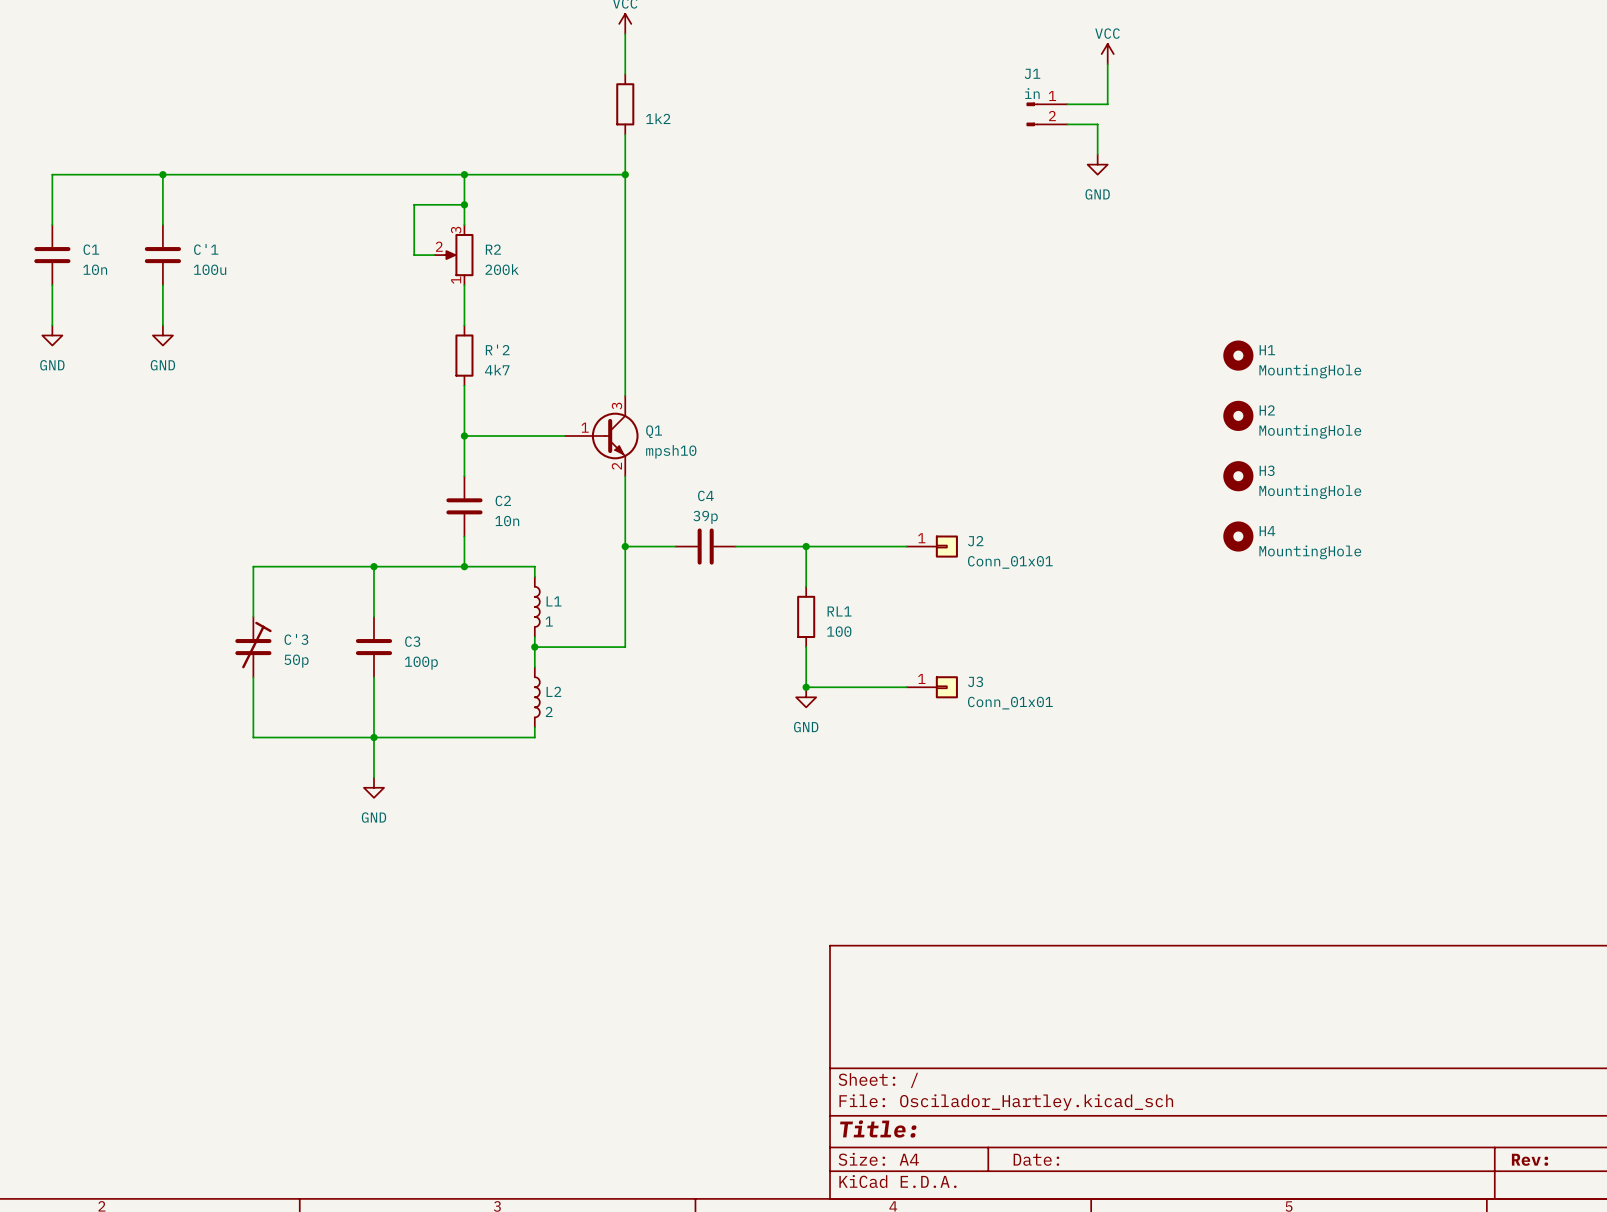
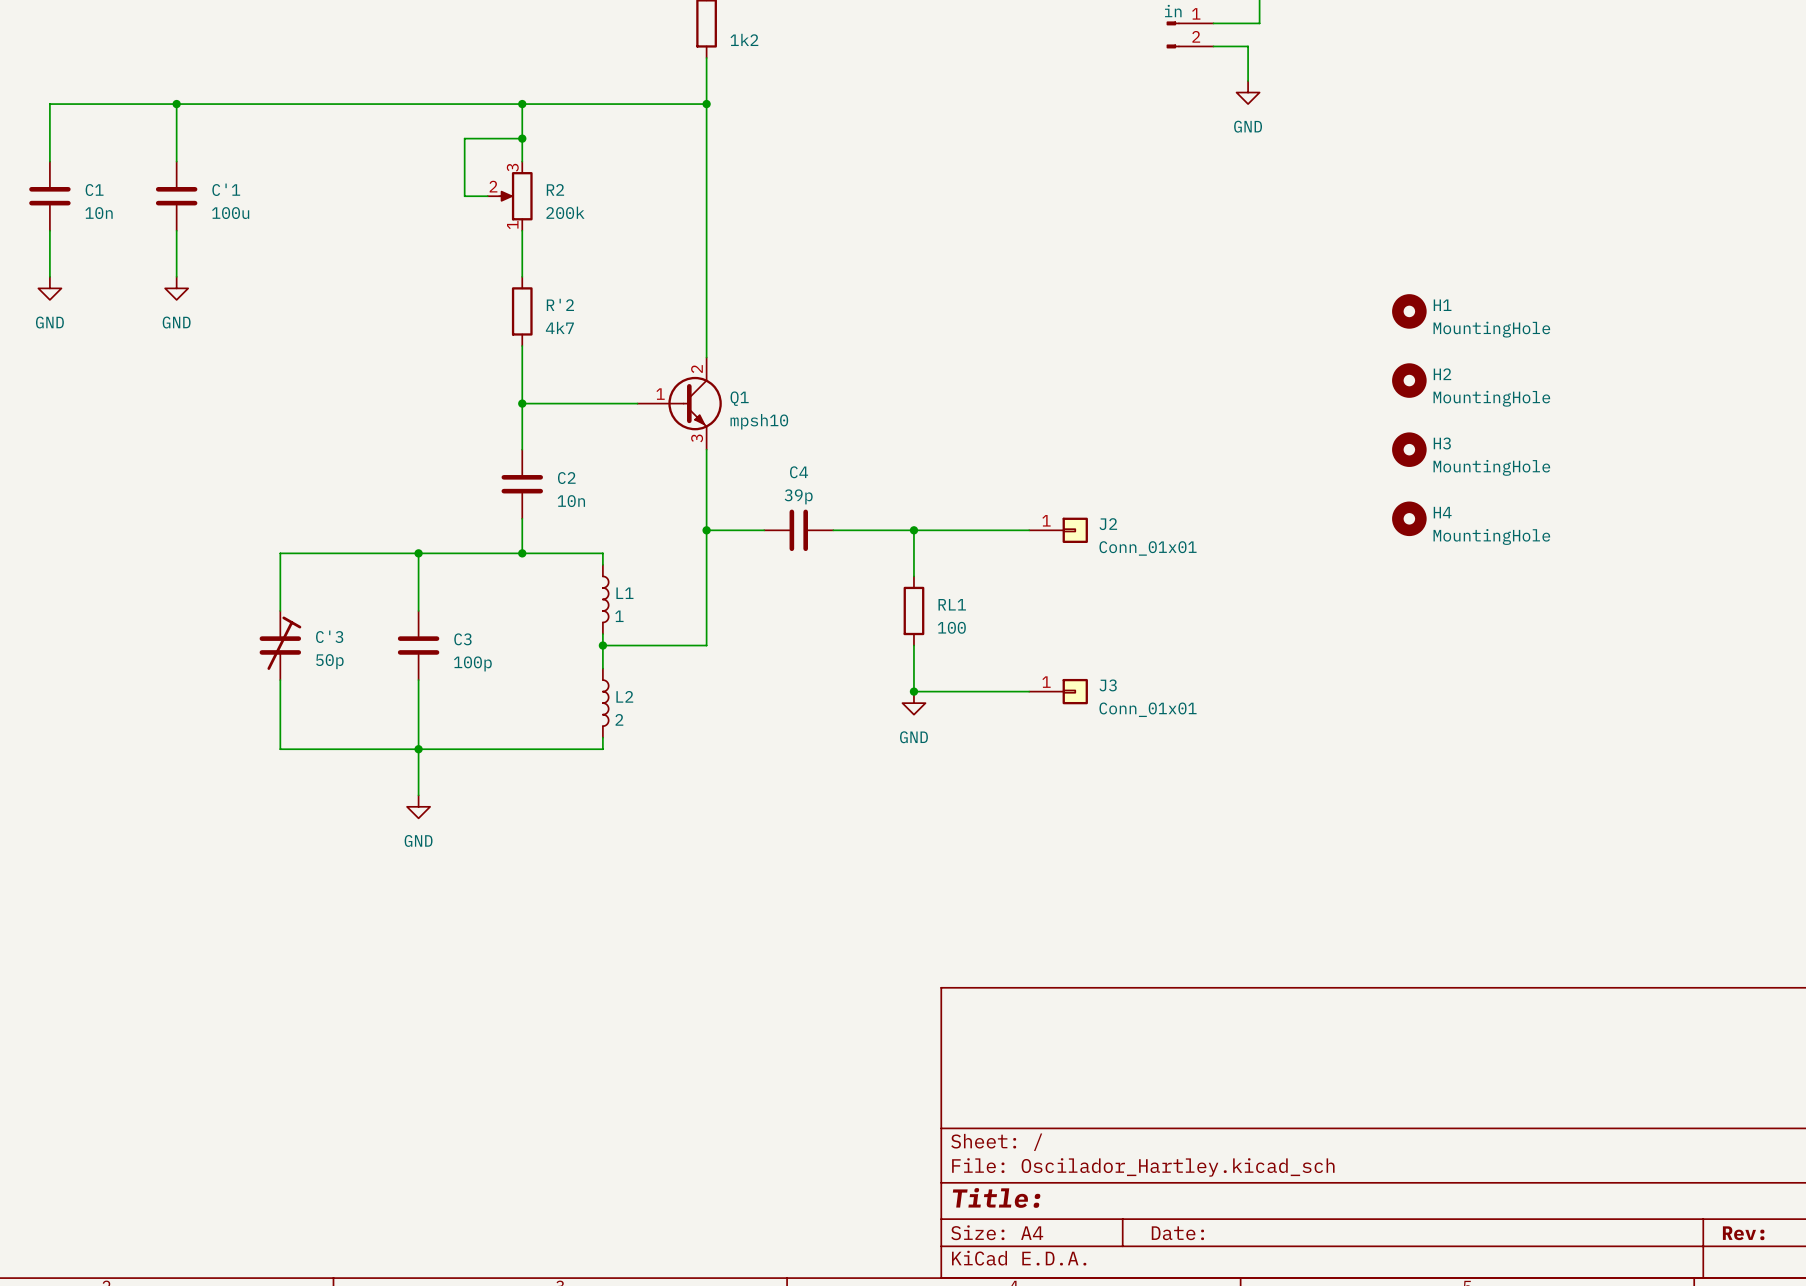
Q1 pin number: 3 (616, 406) -> 2 (697, 369)
Q1 pin number: 2 (616, 466) -> 3 (697, 438)

